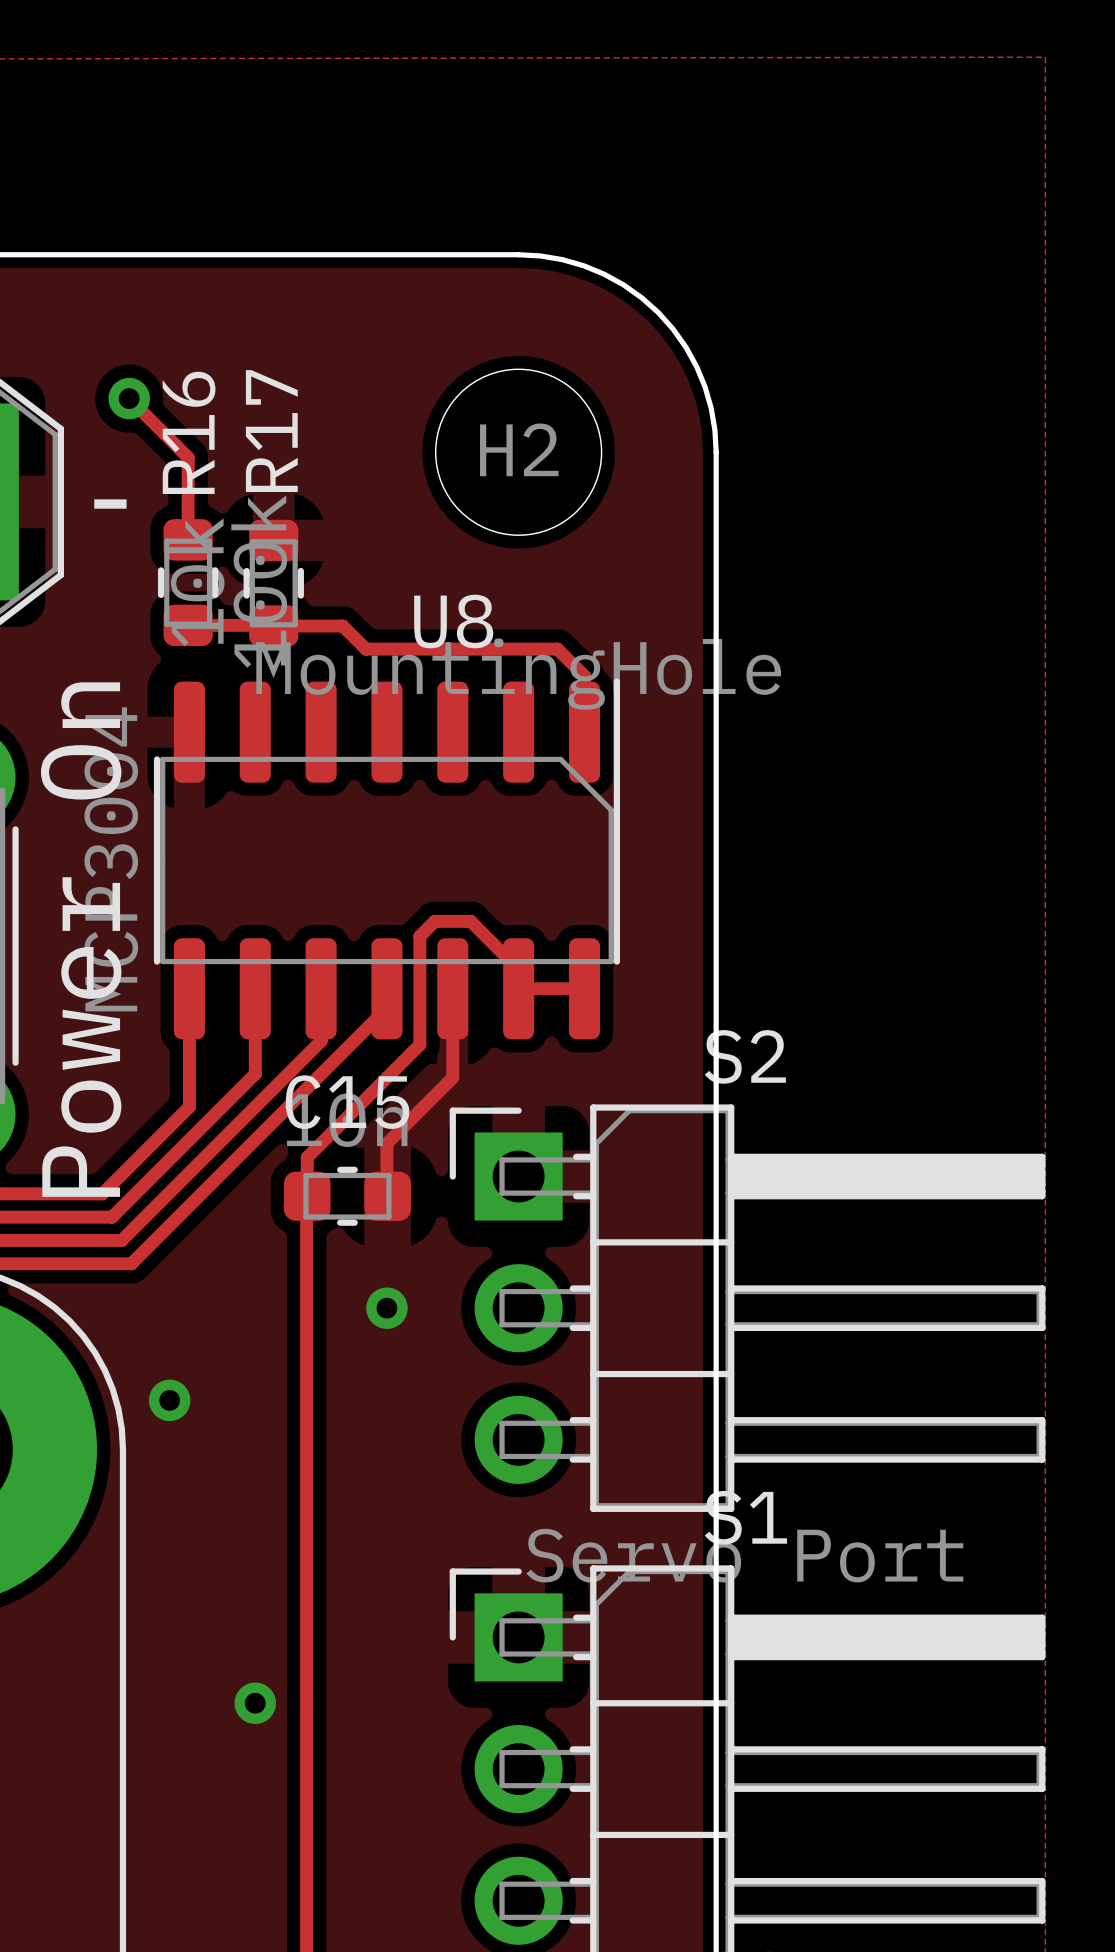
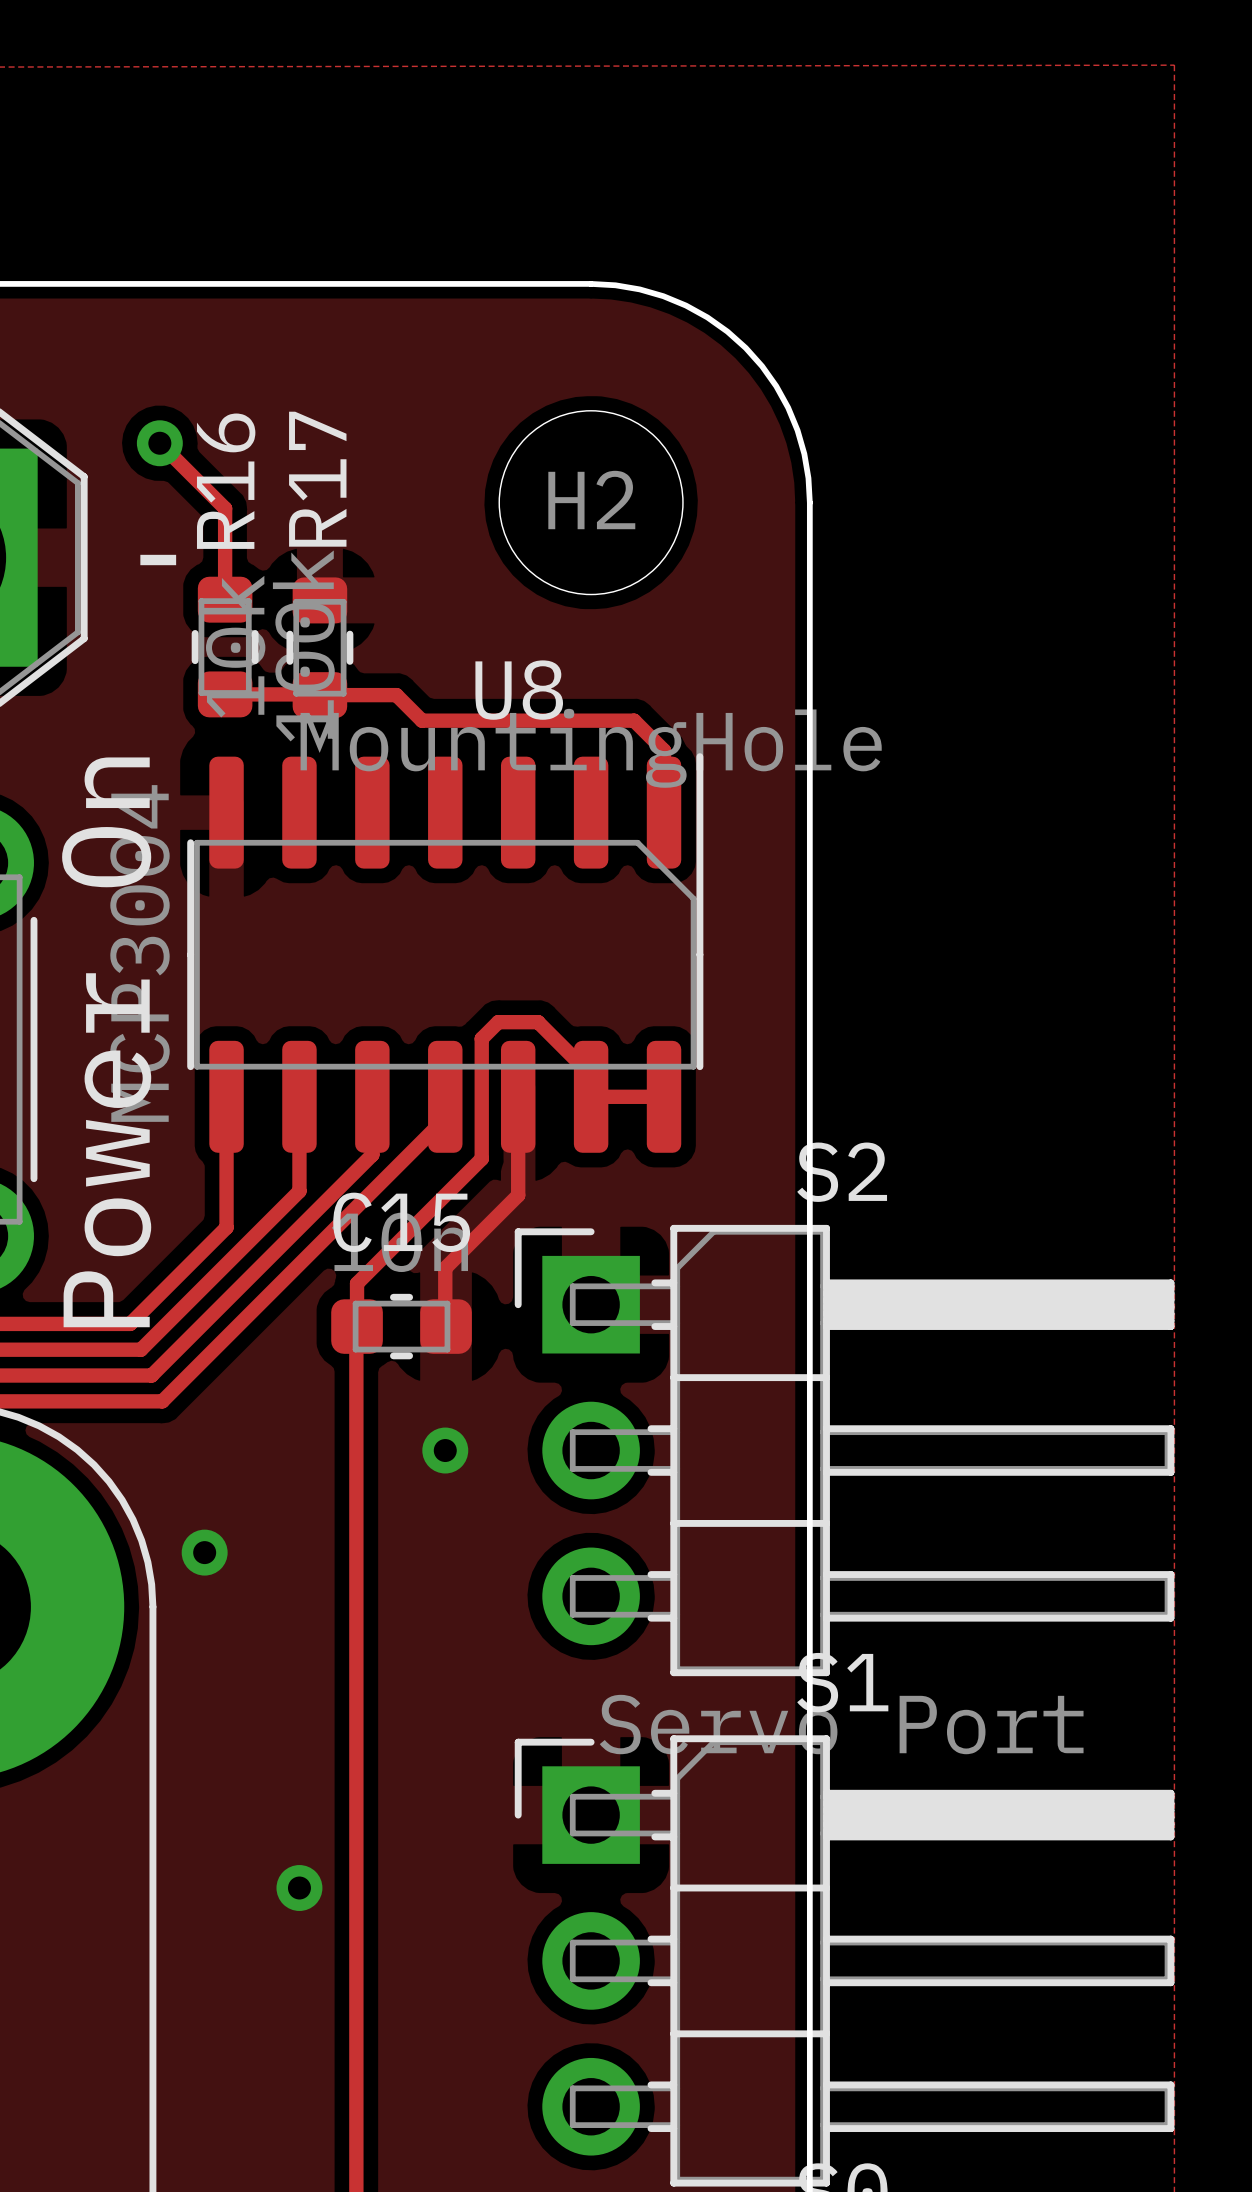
part text position: - (110, 504) -> - (158, 560)

